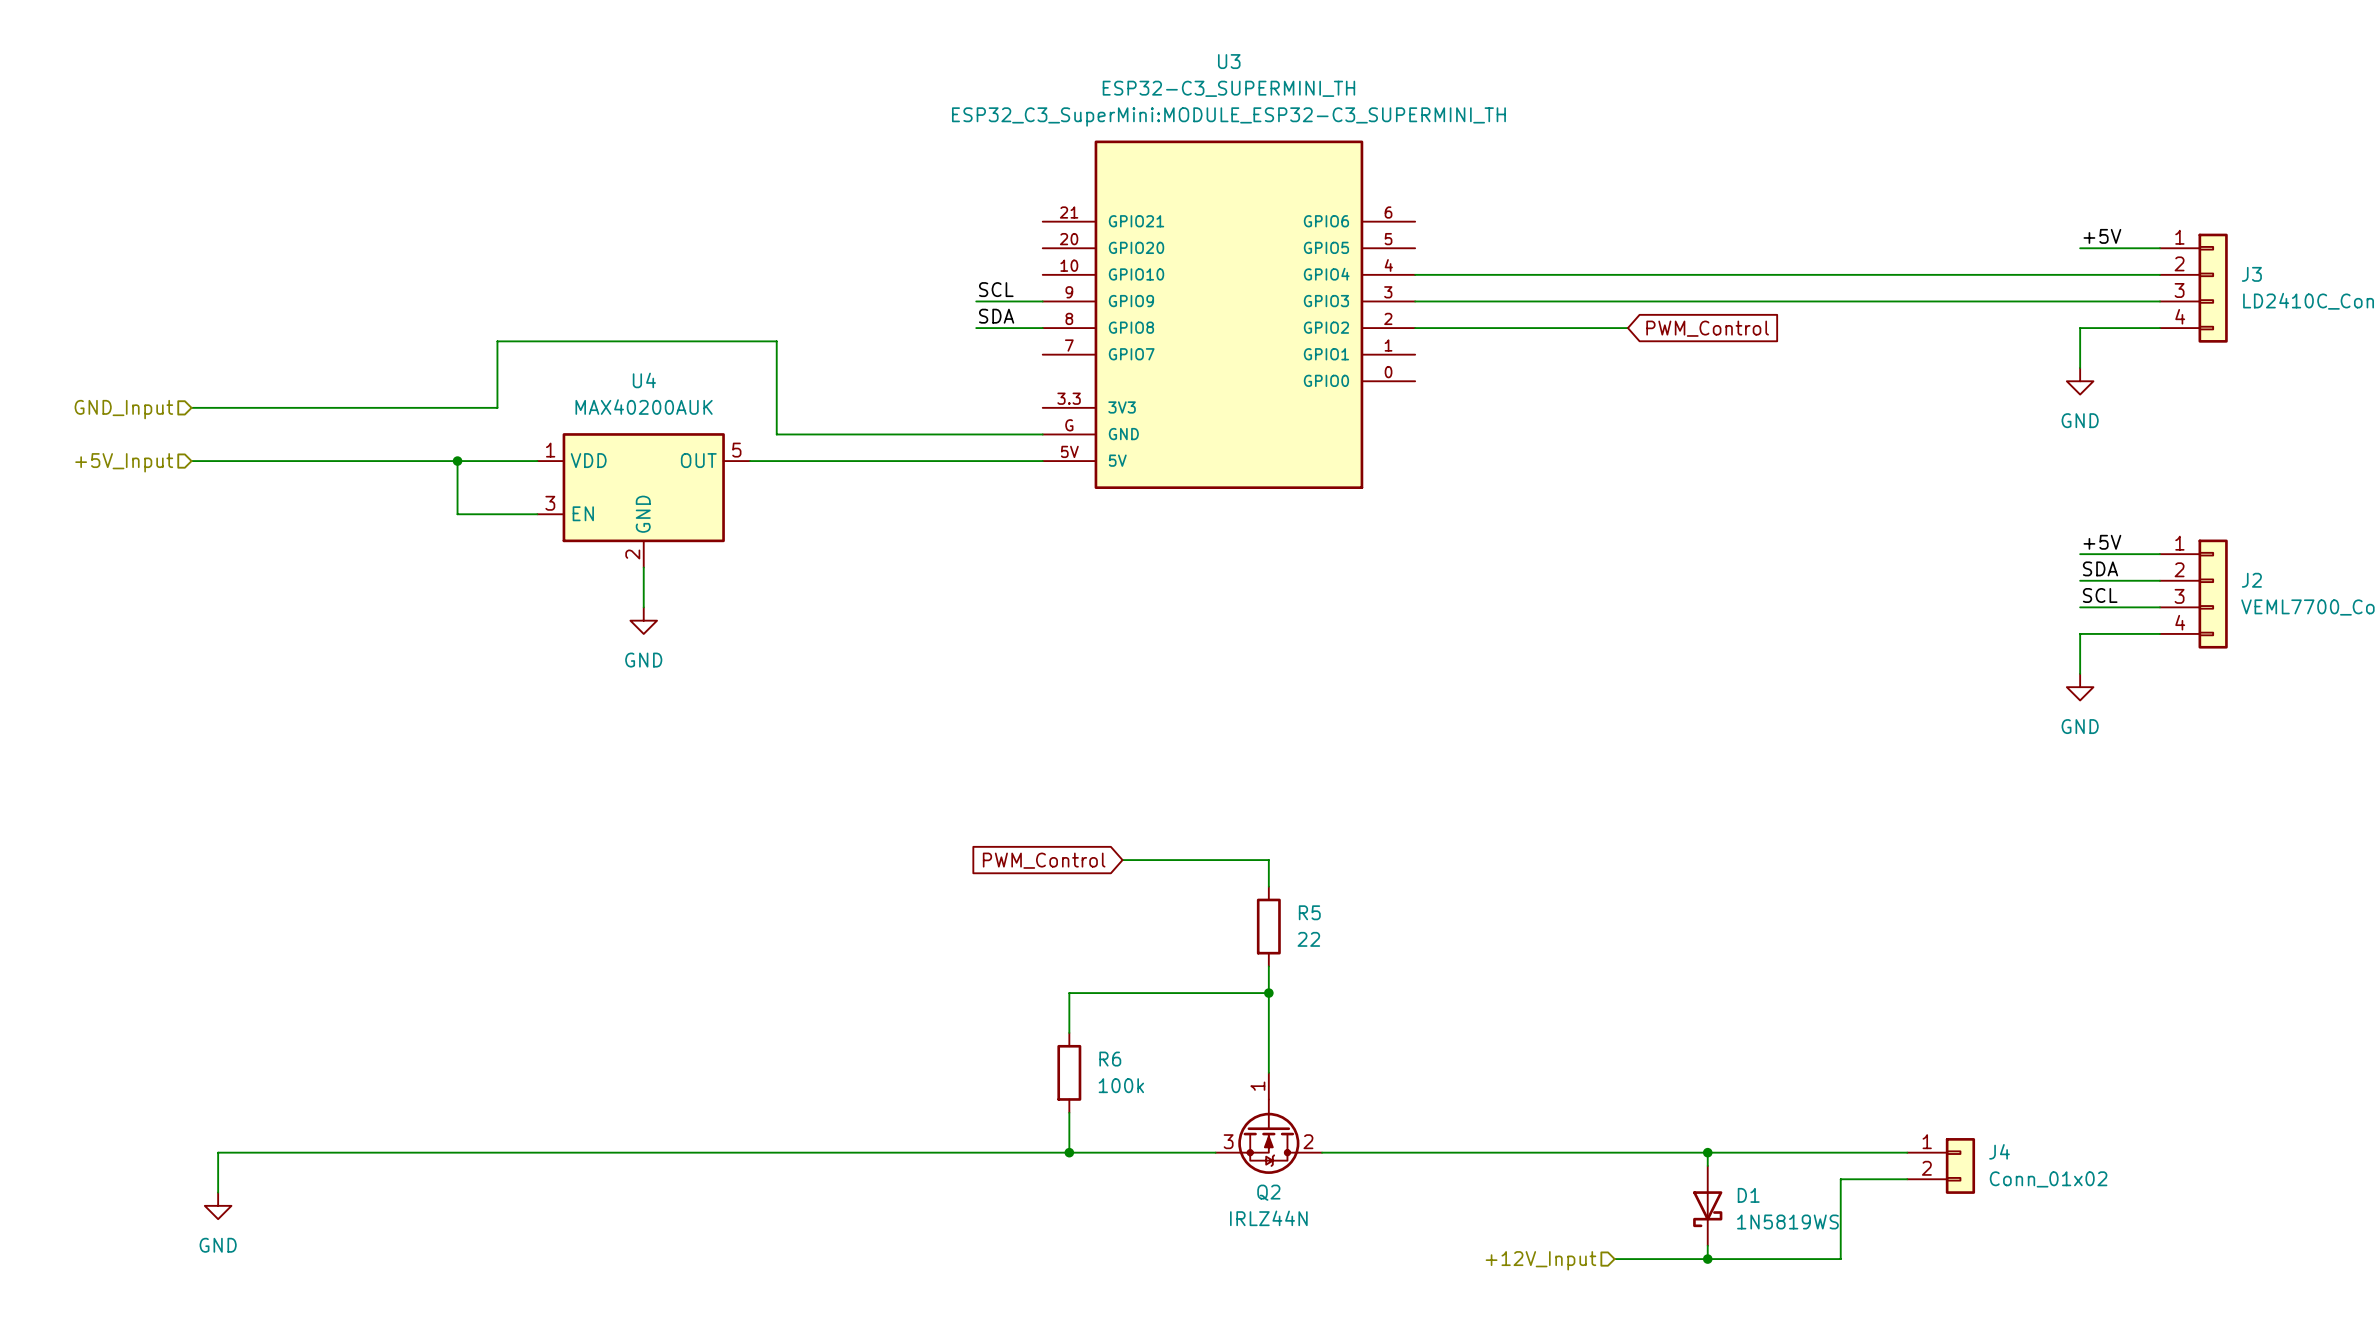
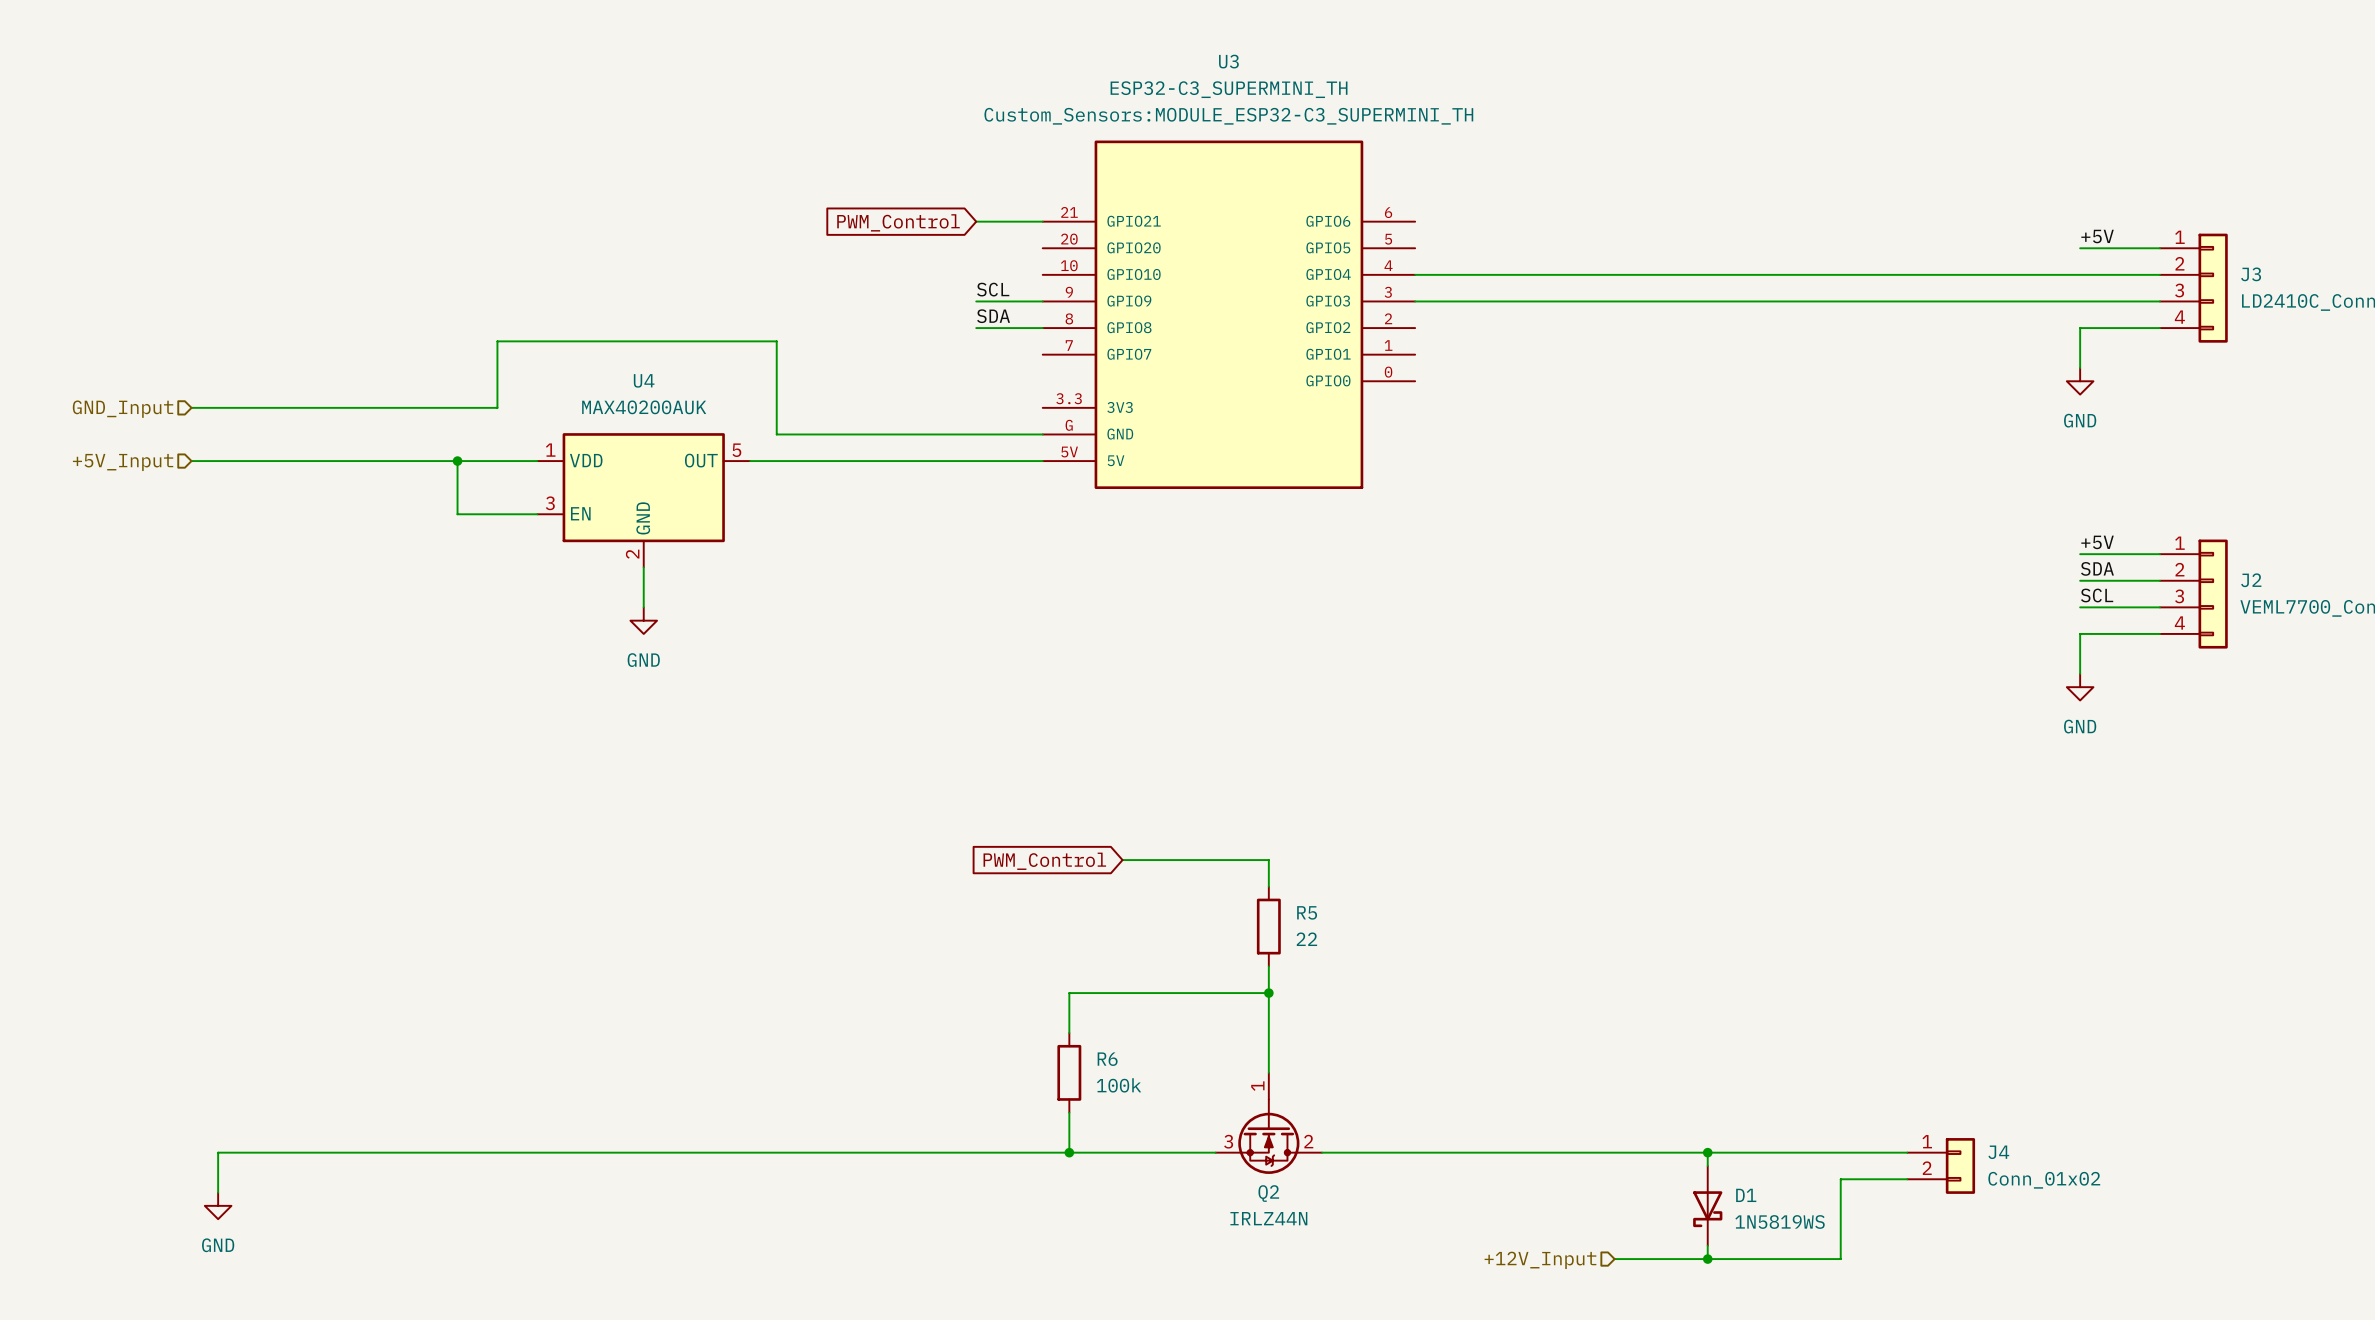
U3 text: ESP32_C3_SuperMini:MODULE_ESP32-C3_SUPERMINI_TH (1228, 116) -> Custom_Sensors:MODULE_ESP32-C3_SUPERMINI_TH (1228, 116)
wire: none -> (976, 221) (1042, 221)
global label: none -> PWM_Control (898, 222)
wire: (1415, 328) (1627, 328) -> none
global label: PWM_Control (1707, 328) -> none

